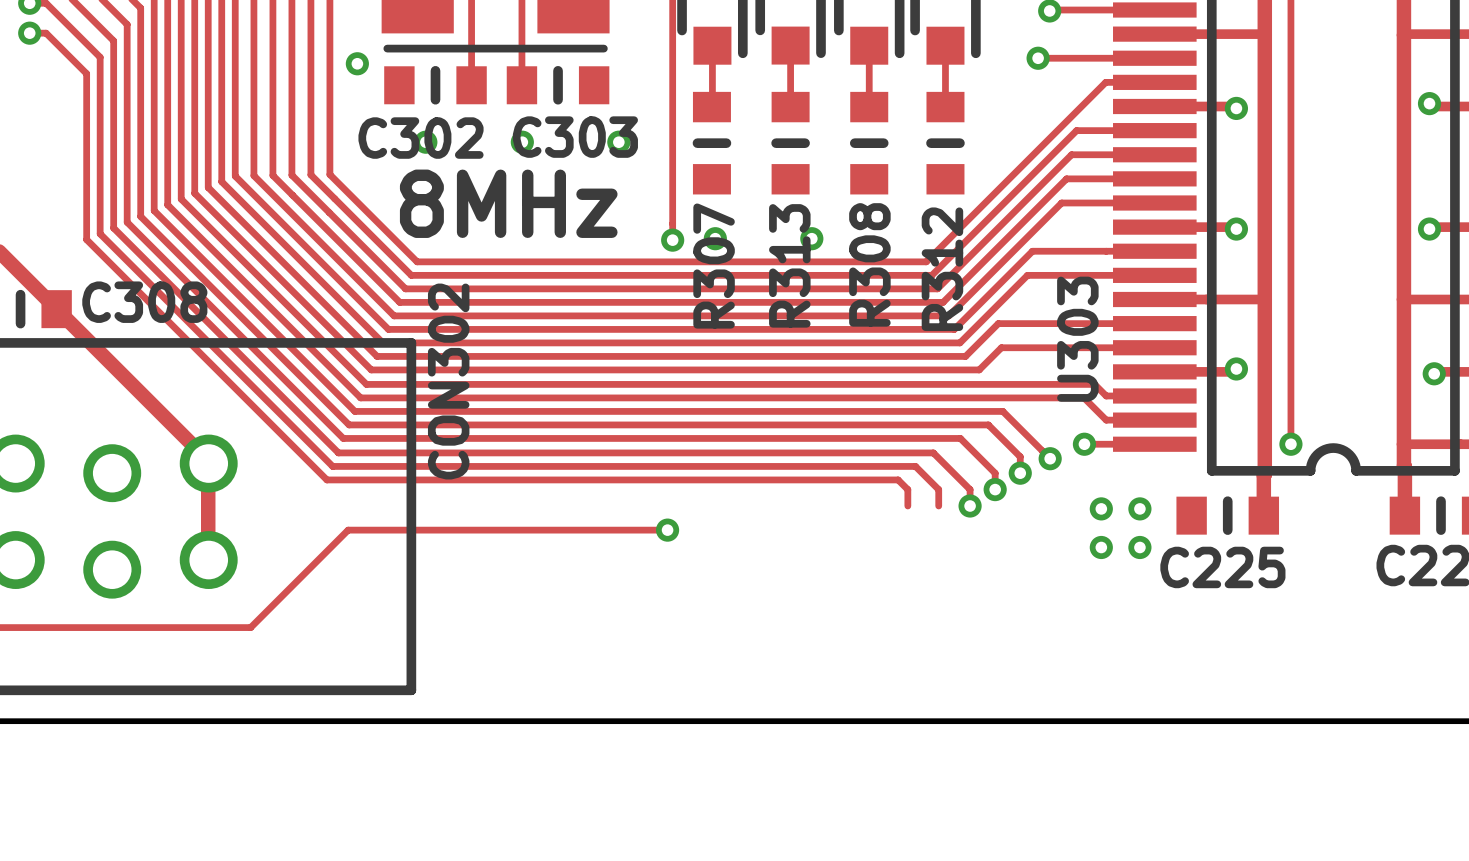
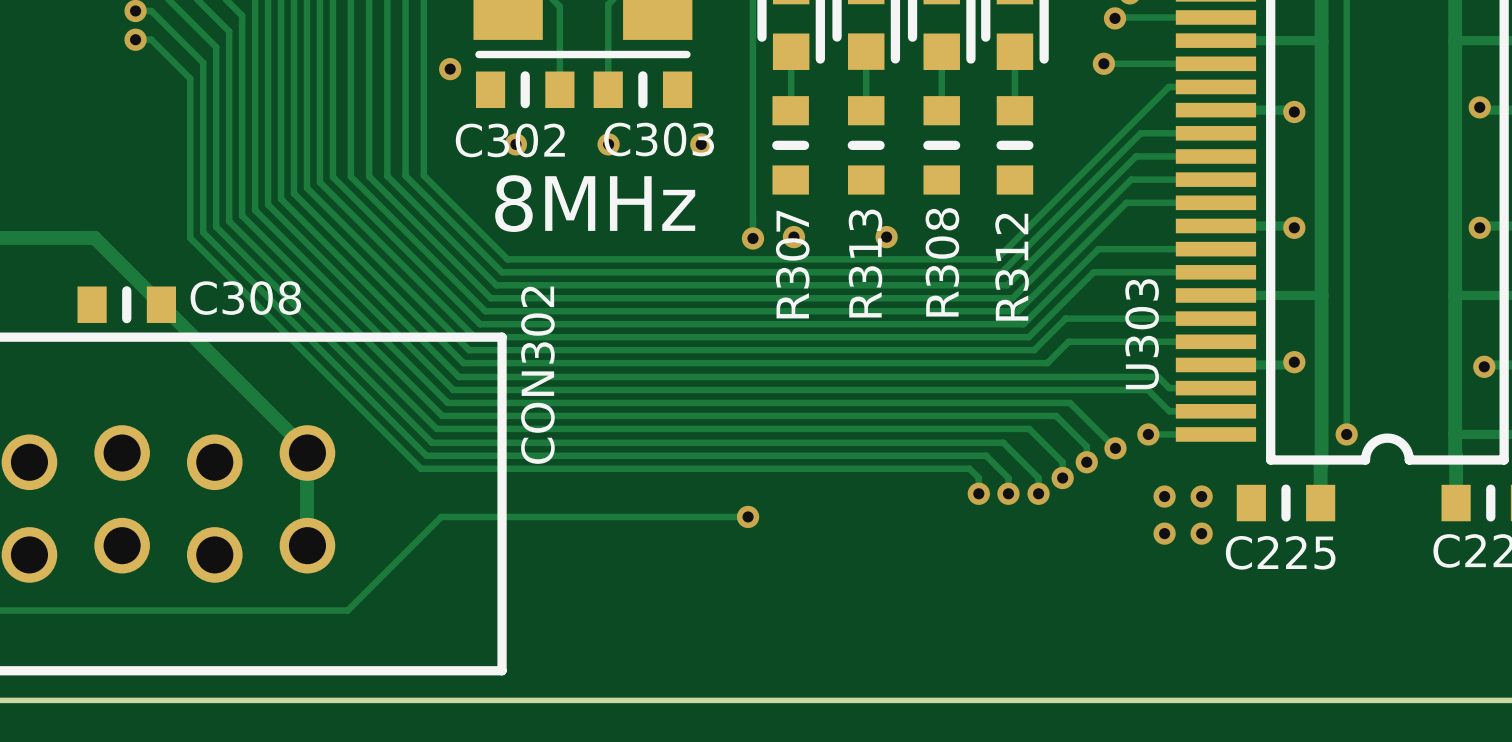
via: none -> (978, 493)
via: none -> (1008, 493)

